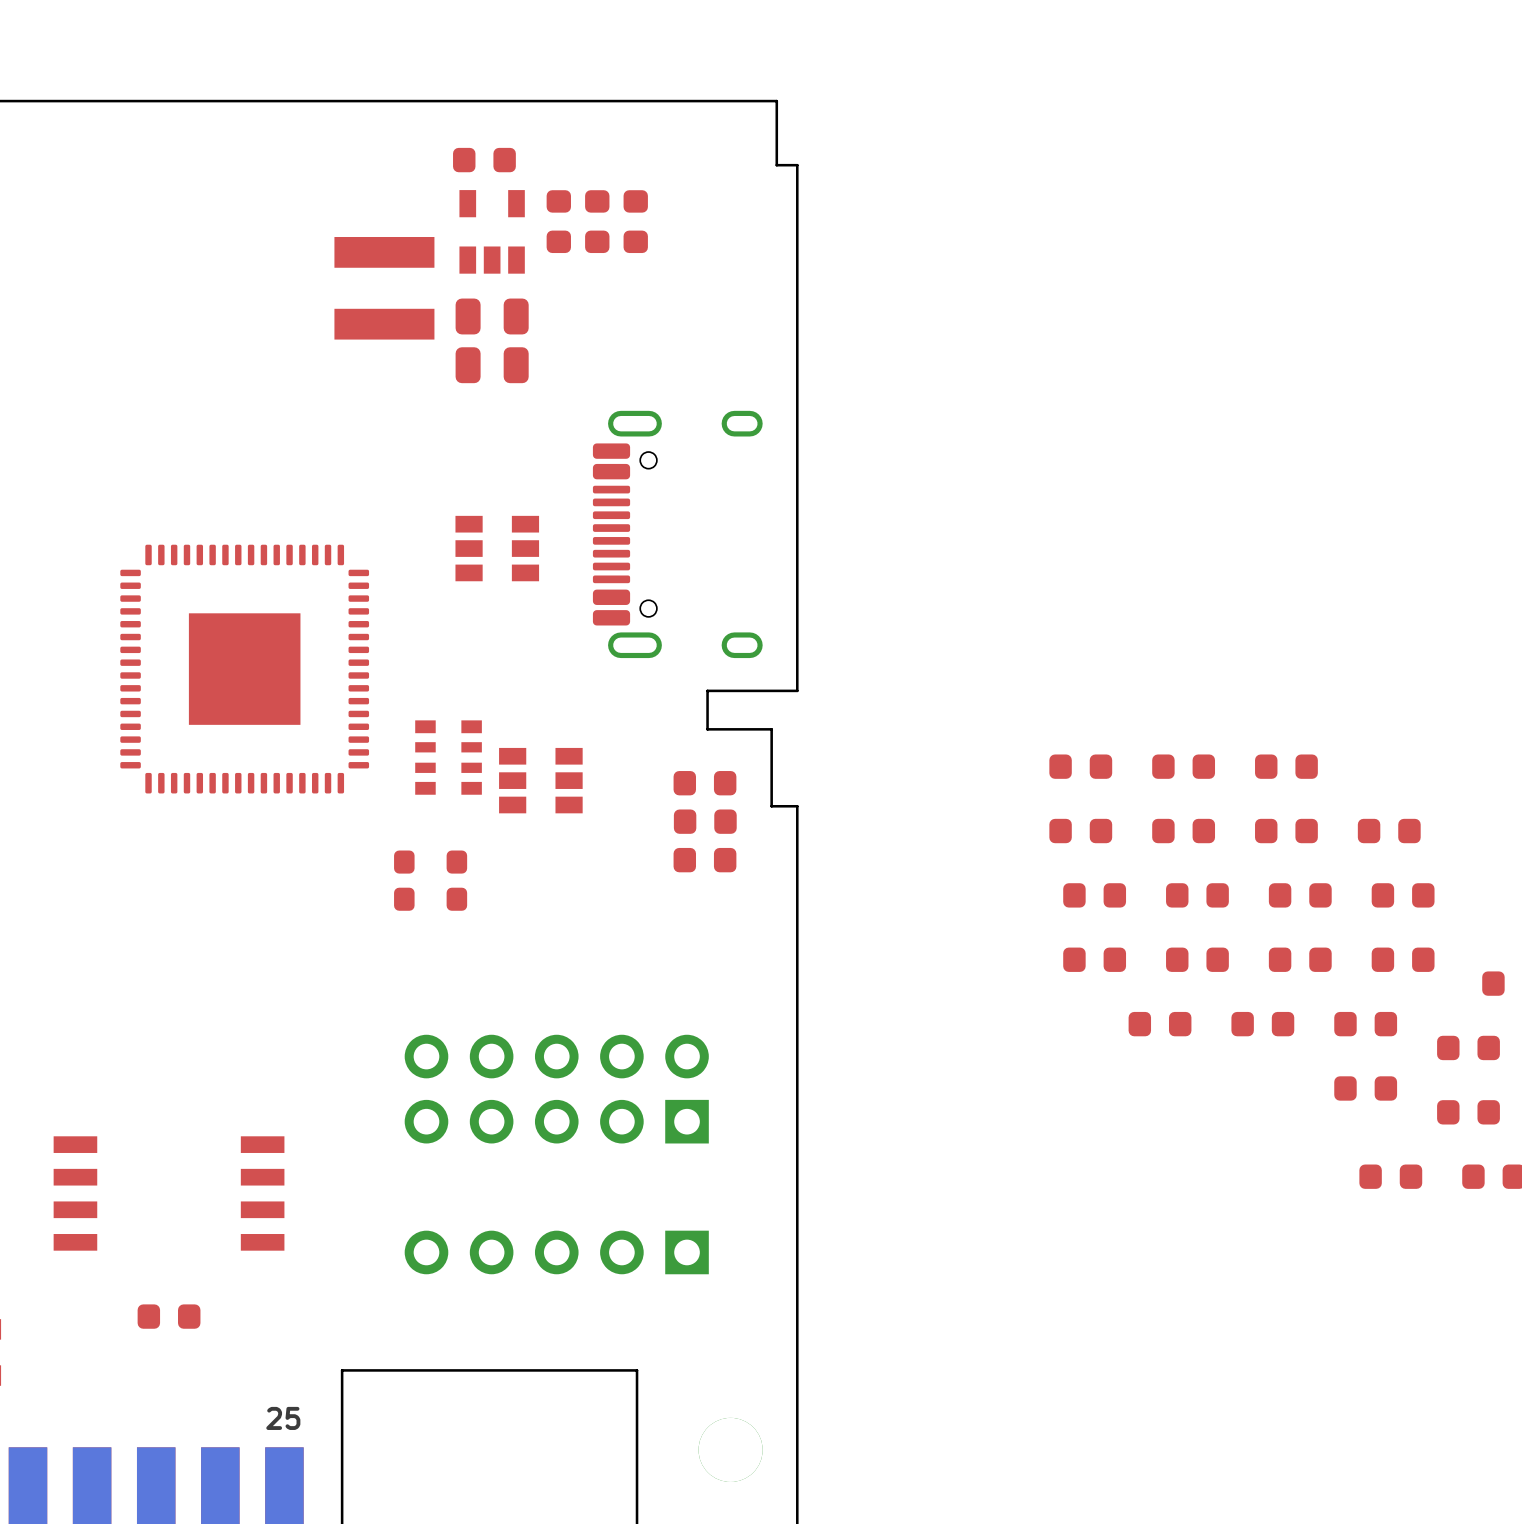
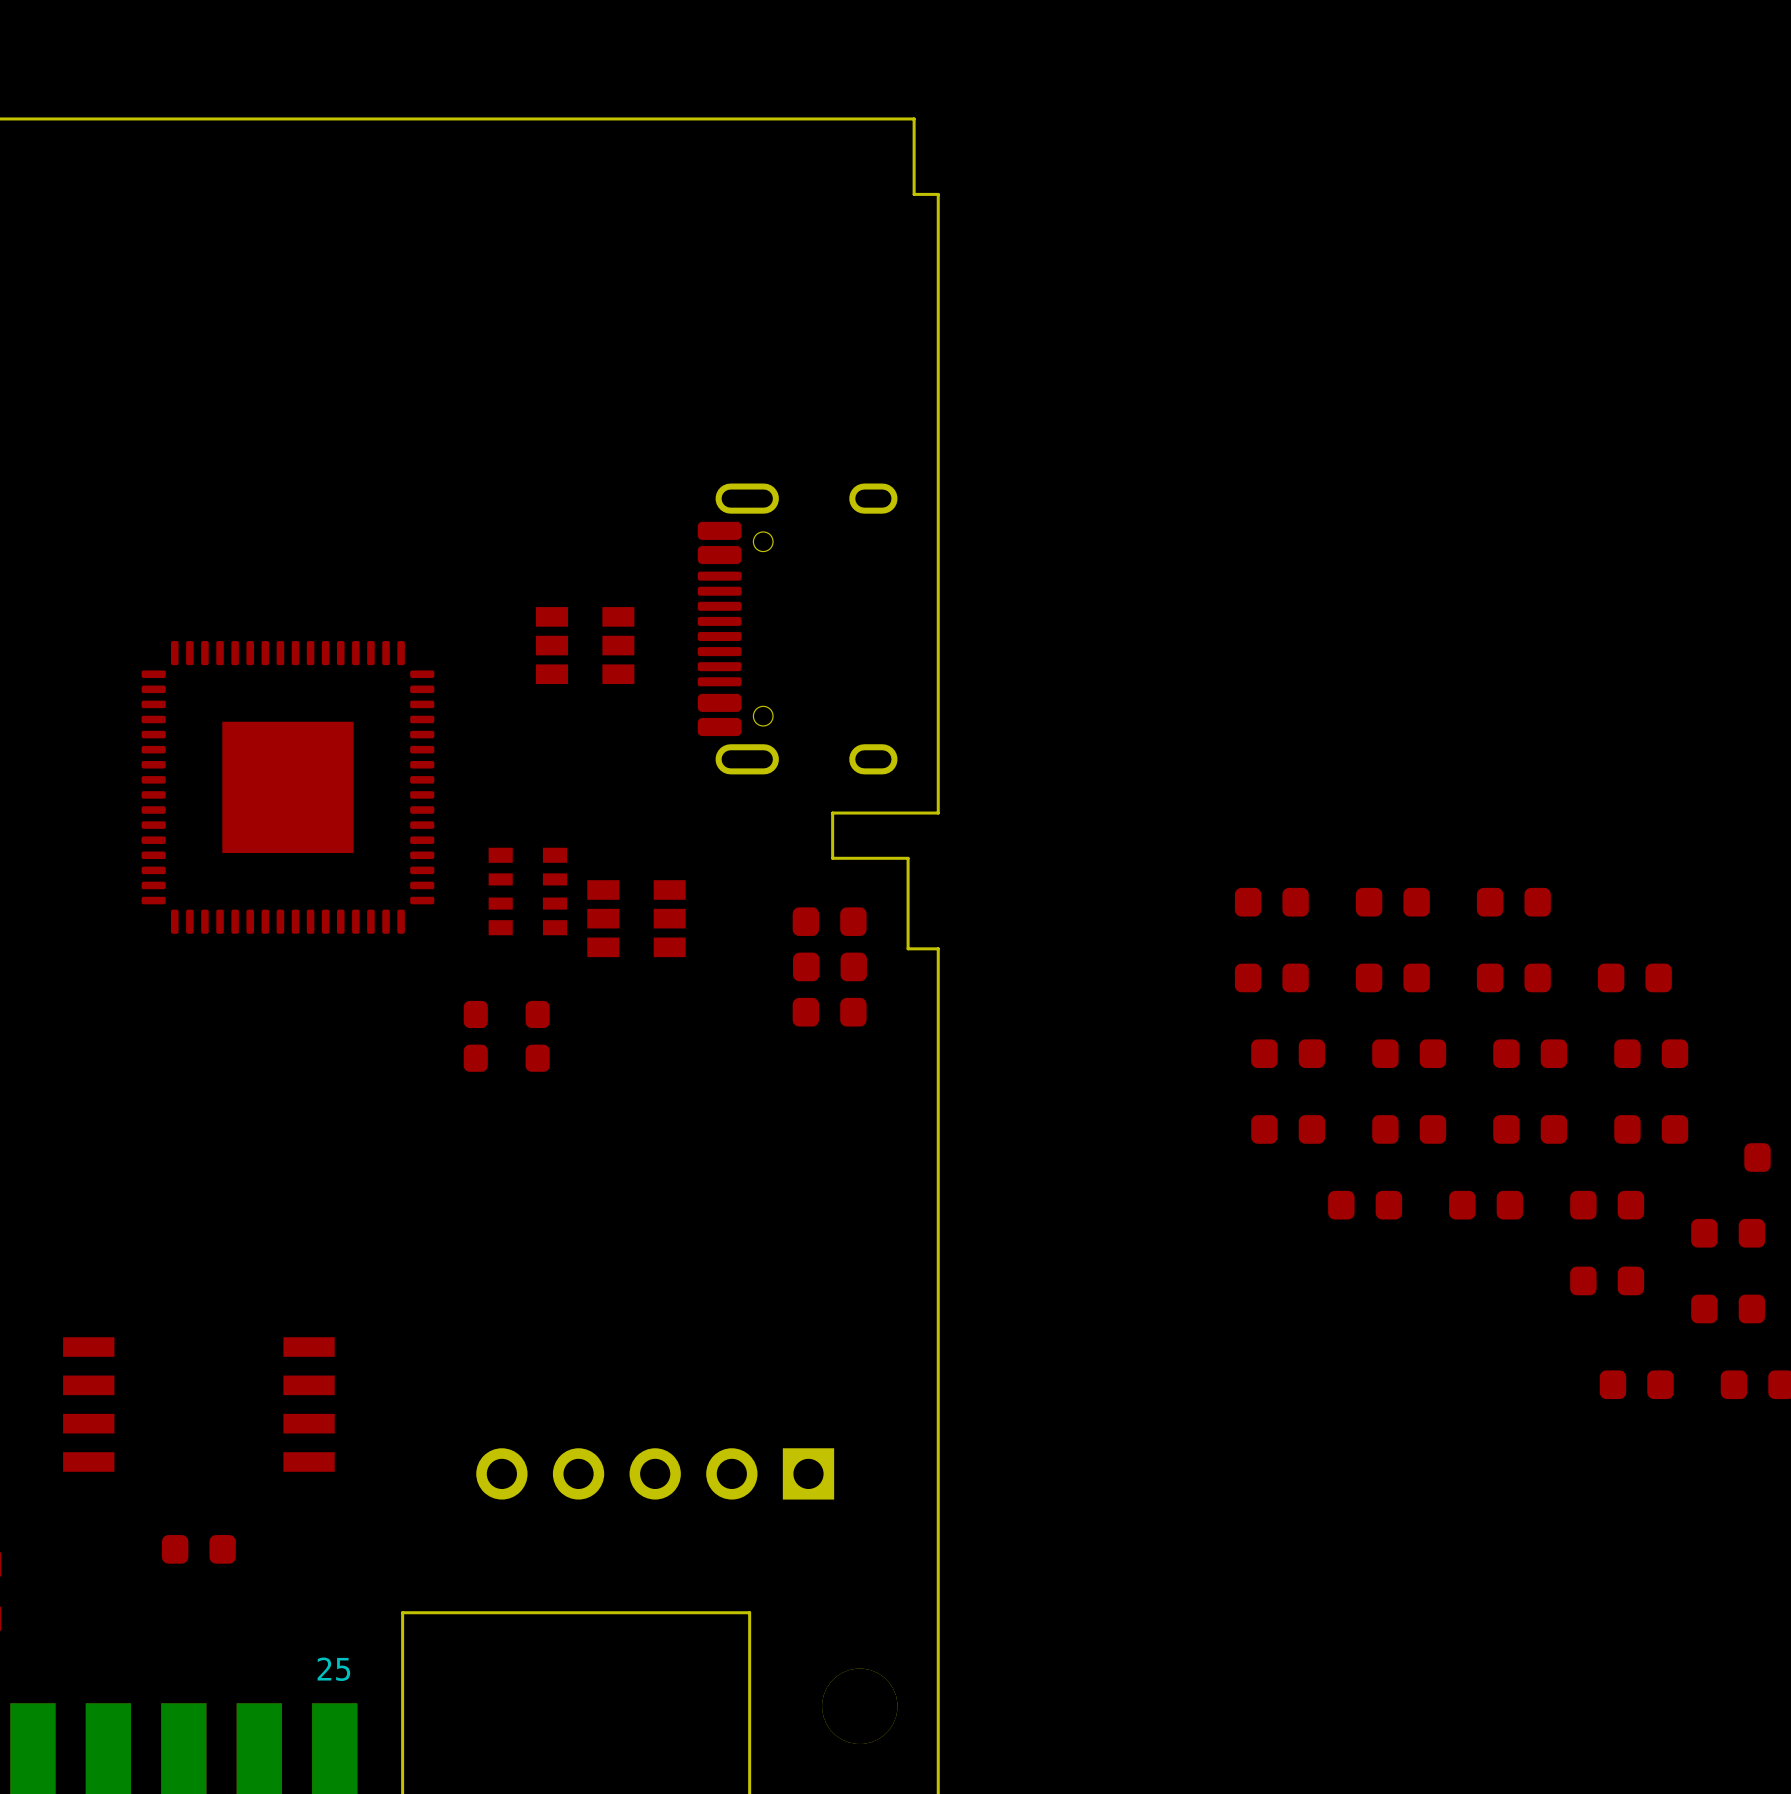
part: (484, 160) -> none
part: (558, 221) -> none
part: (597, 221) -> none
part: (635, 221) -> none
part: (492, 231) -> none
part: (384, 288) -> none
part: (492, 316) -> none
part: (492, 365) -> none
part: (556, 1089) -> none

